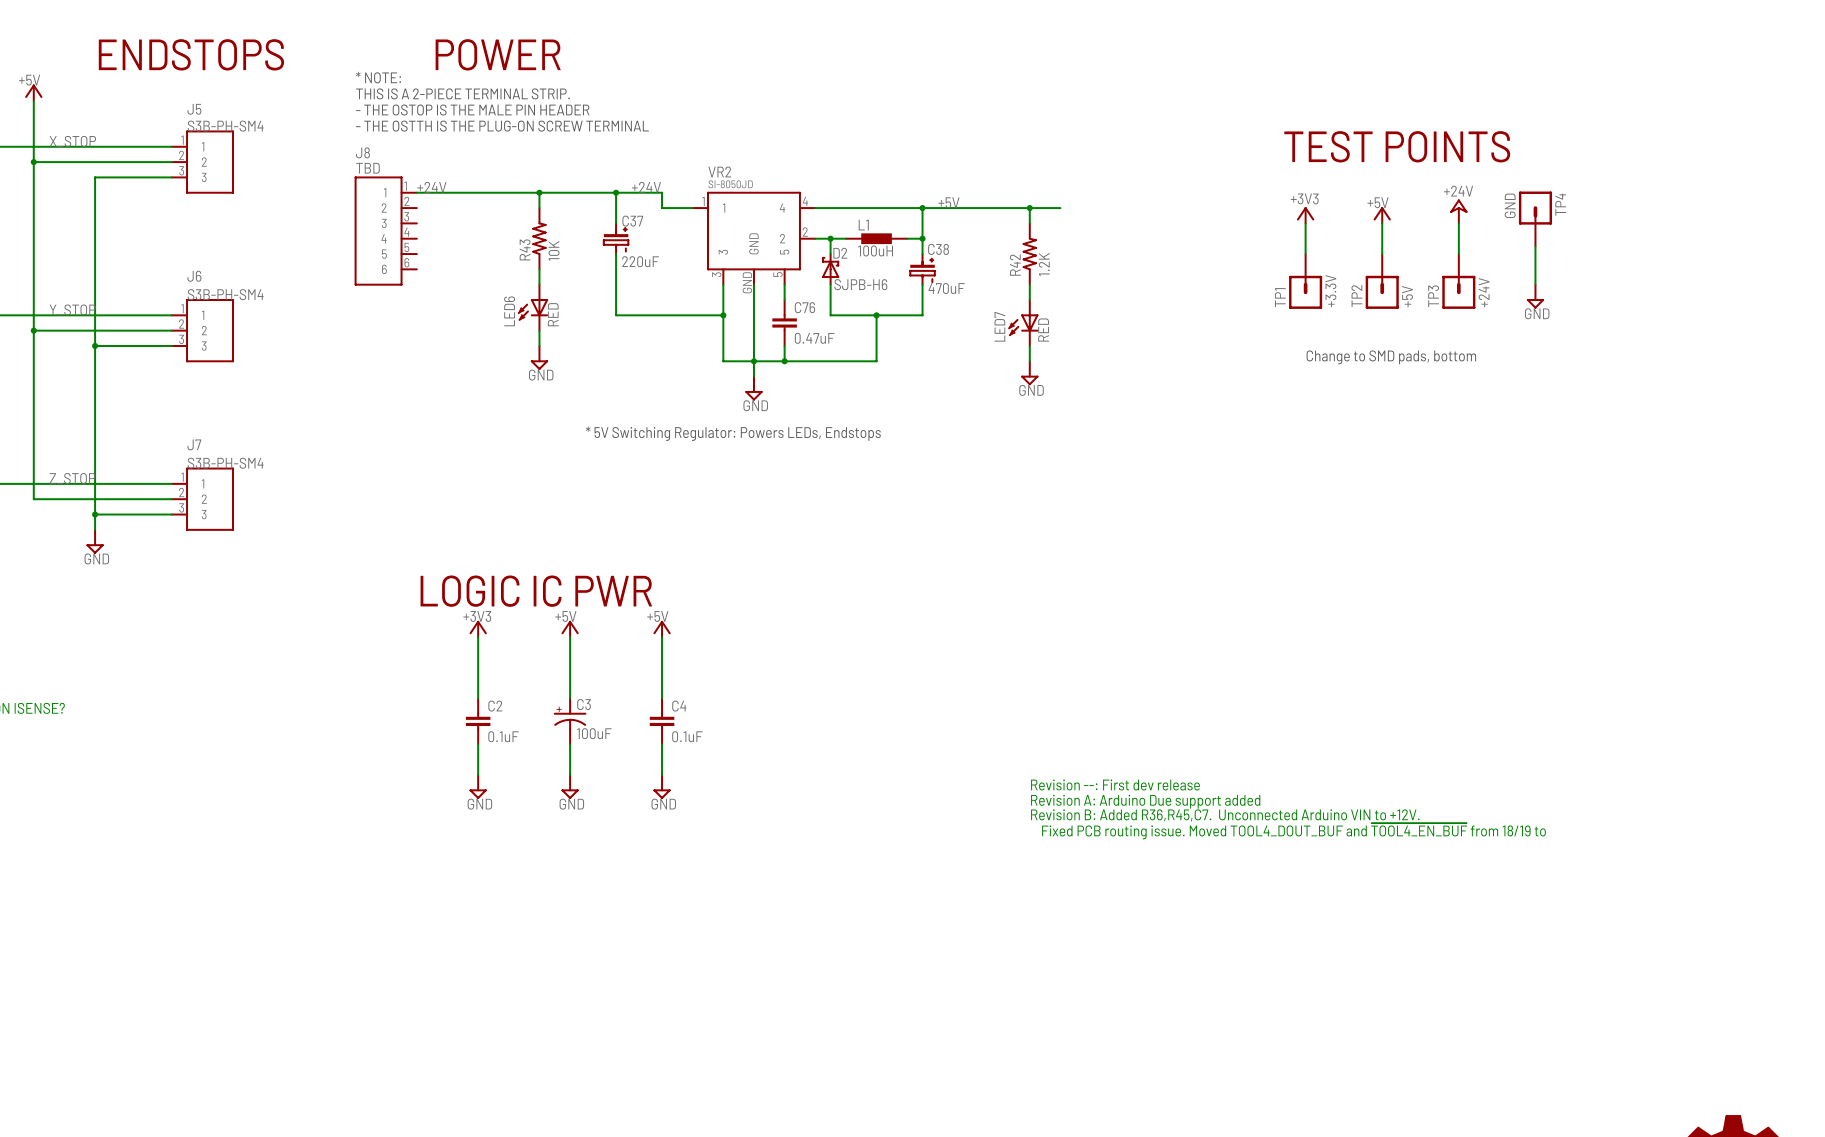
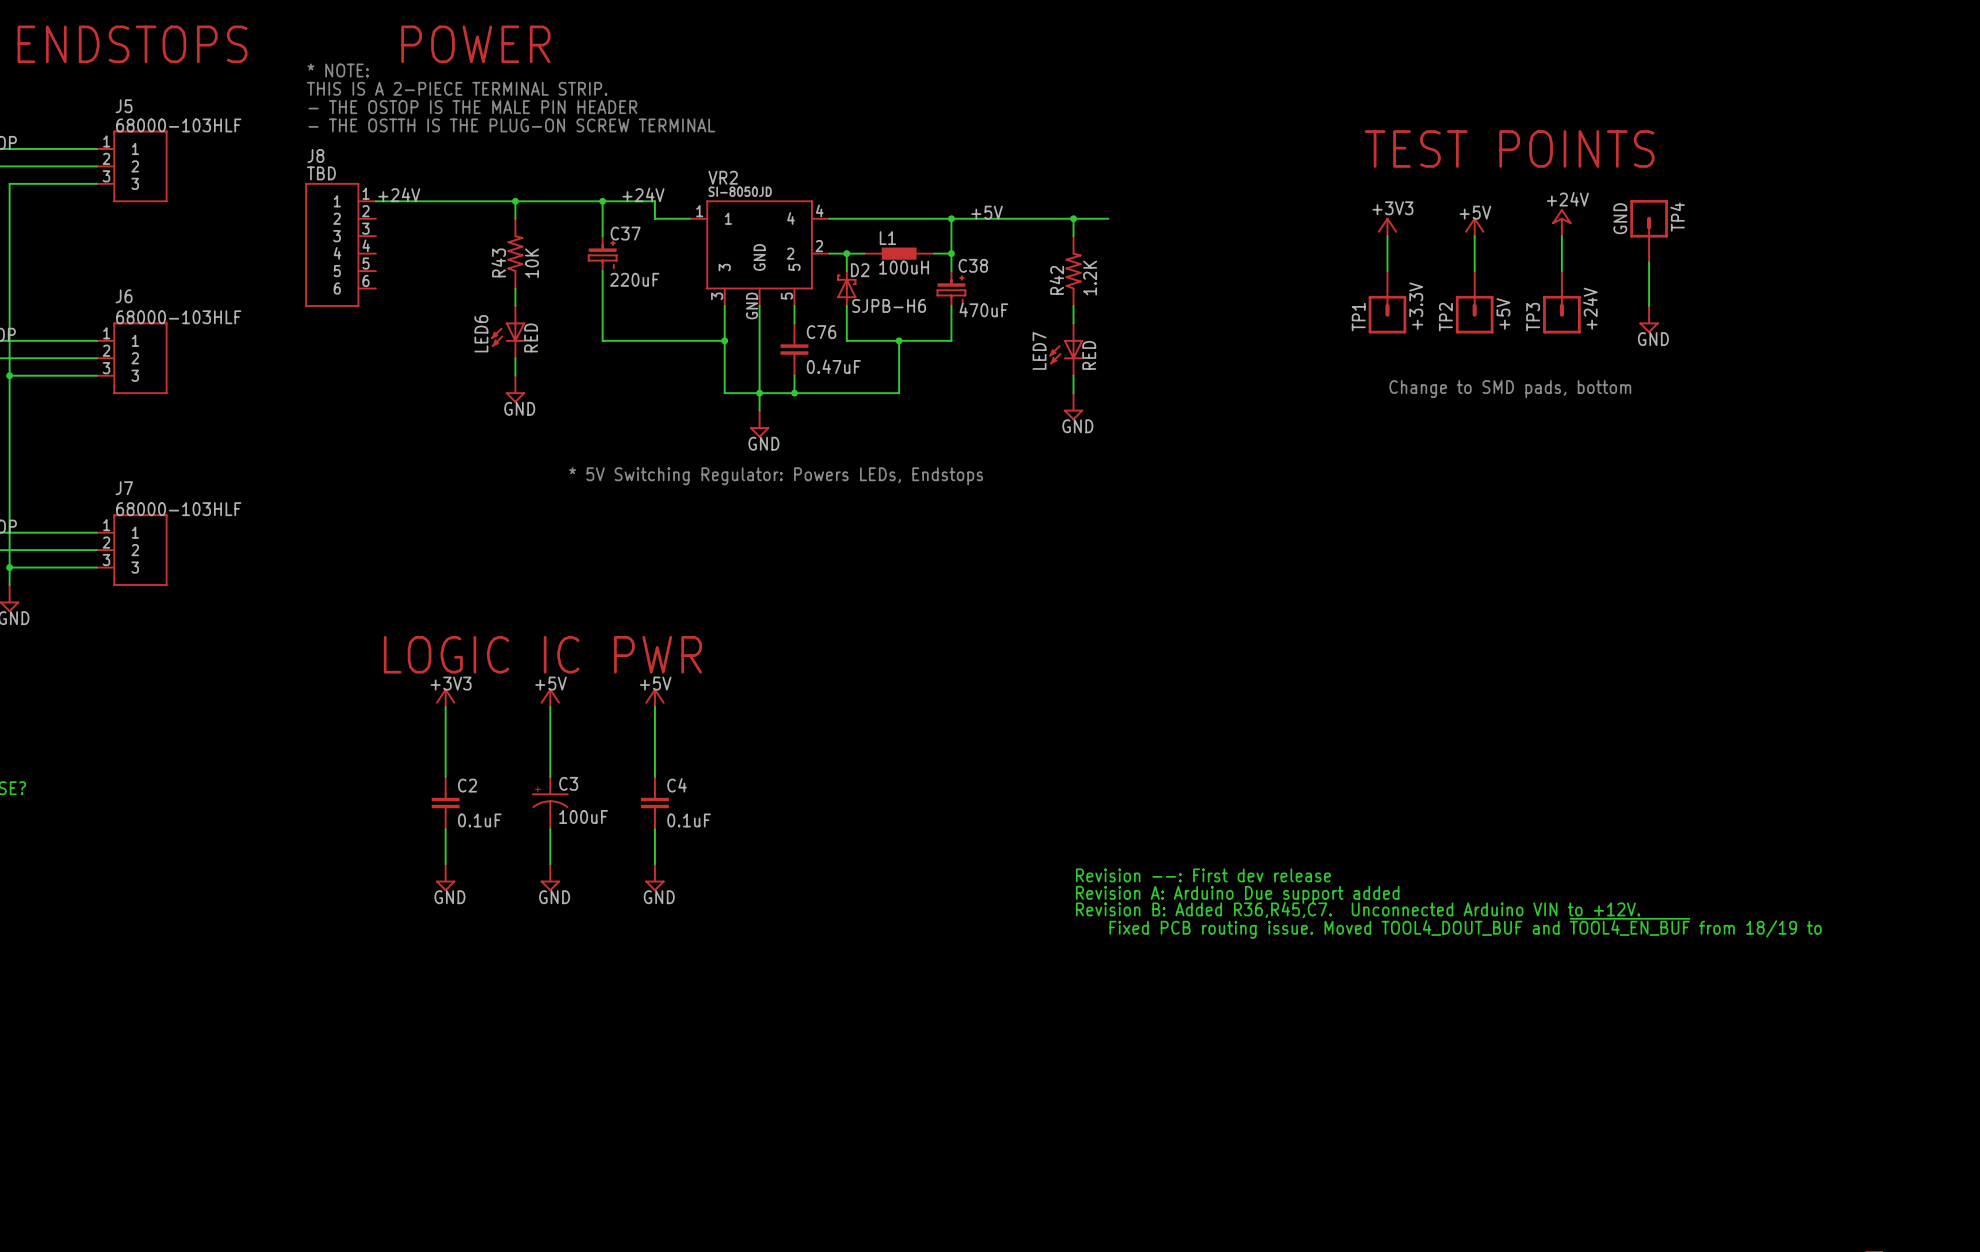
J5 value: S3B-PH-SM4 (225, 126) -> 68000-103HLF (178, 125)
J6 value: S3B-PH-SM4 (225, 294) -> 68000-103HLF (178, 317)
J7 value: S3B-PH-SM4 (225, 463) -> 68000-103HLF (178, 509)

